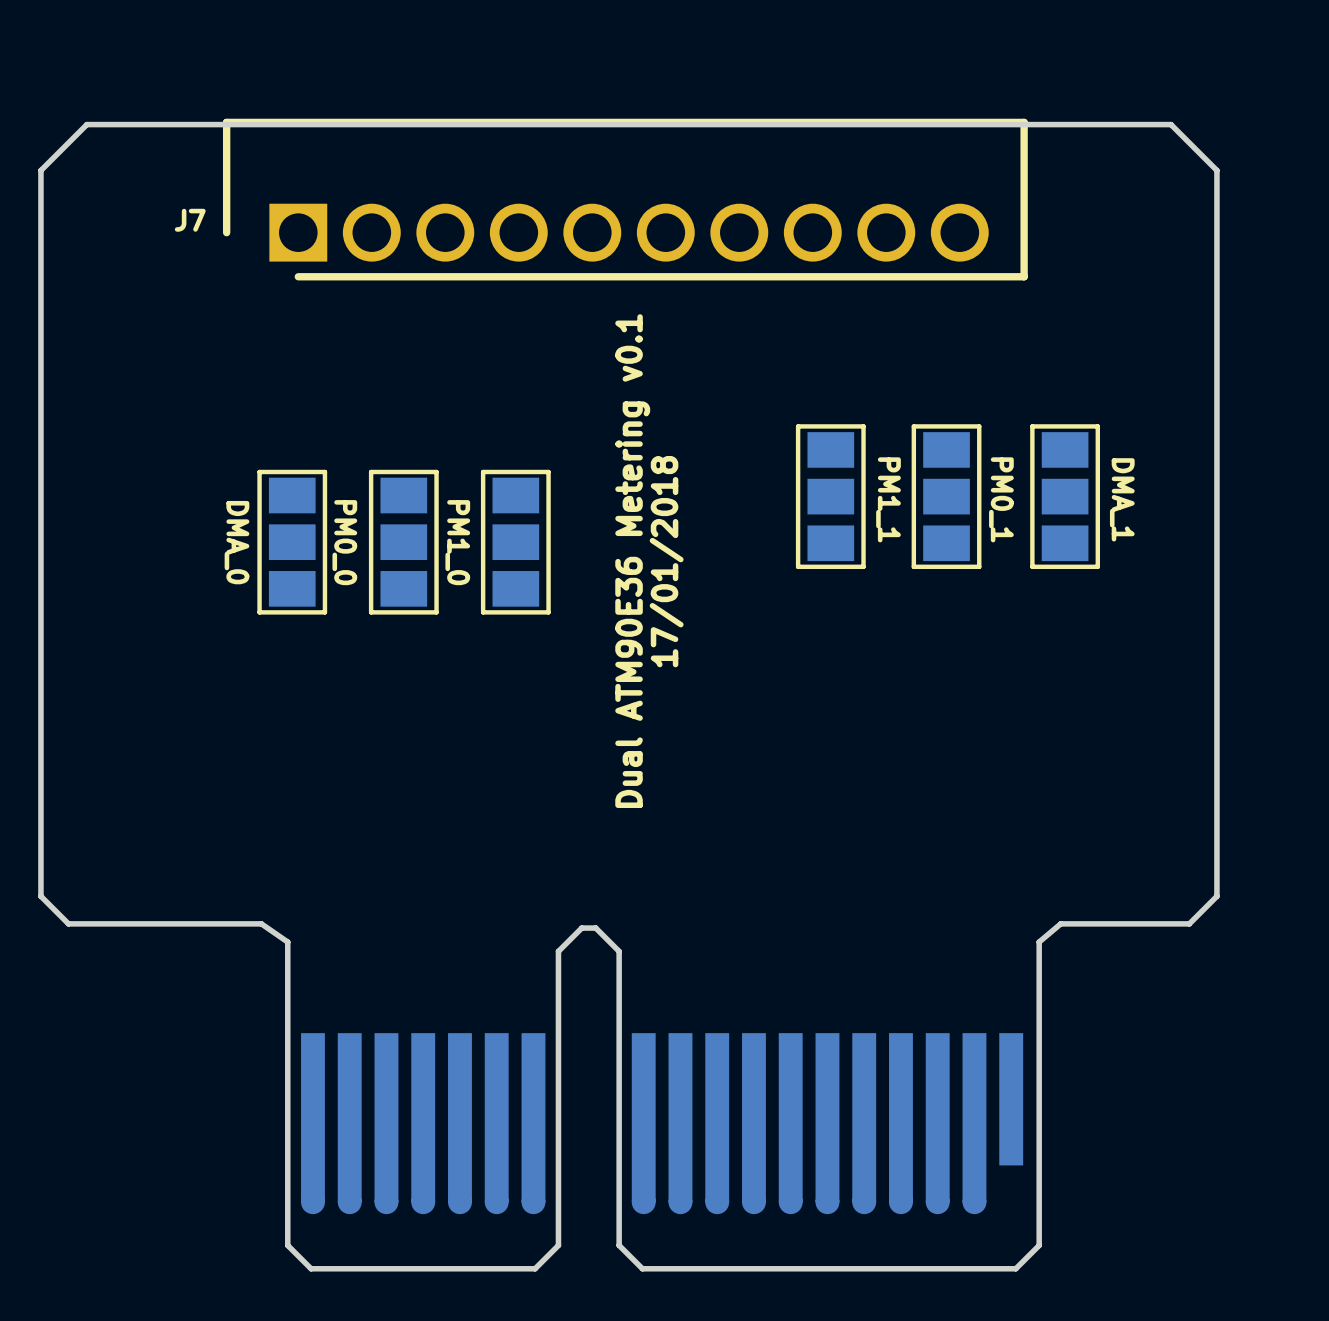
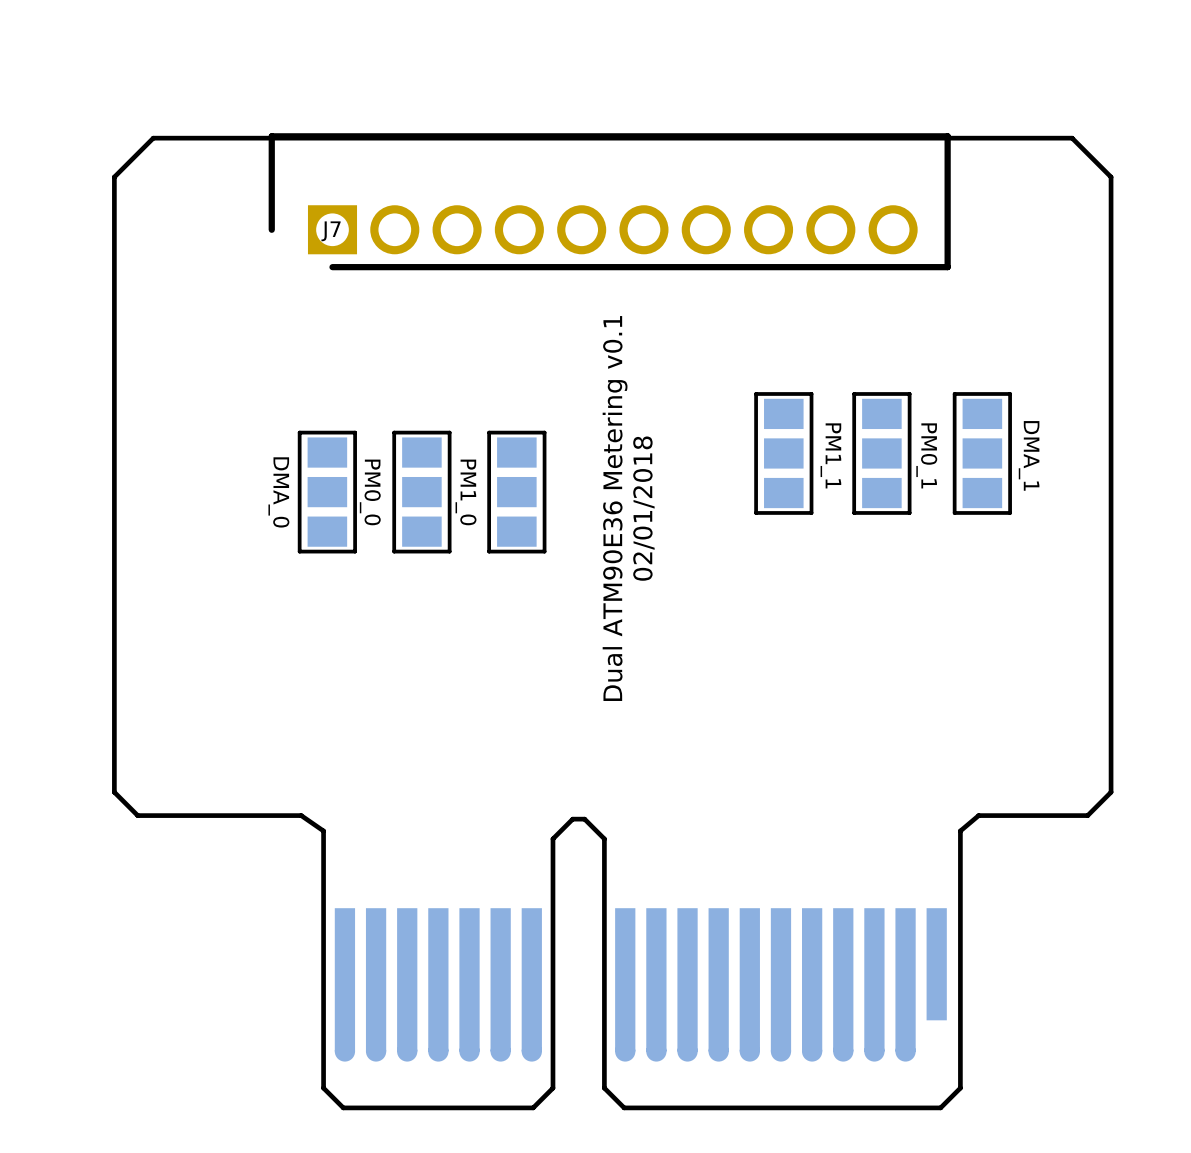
J7 name position: J7 (190, 220) -> J7 (331, 231)
text: 17/01/2018 (666, 561) -> 02/01/2018 (643, 508)

